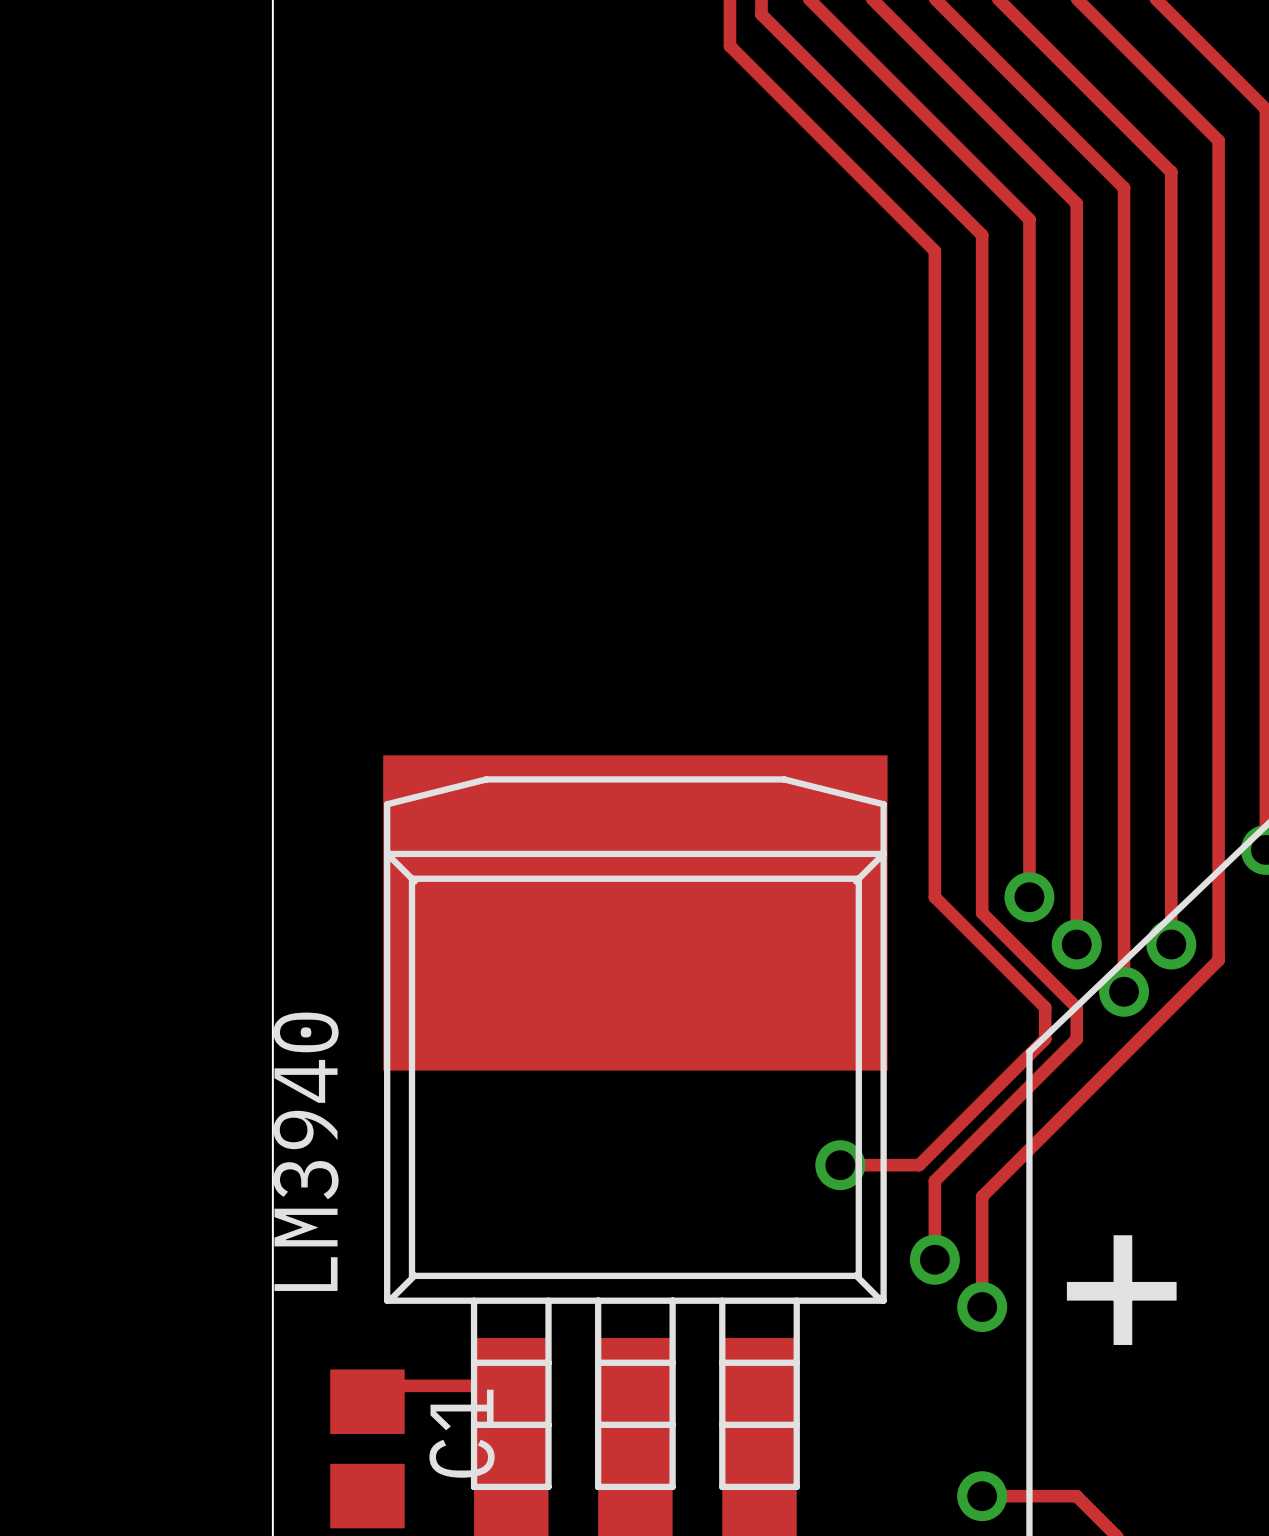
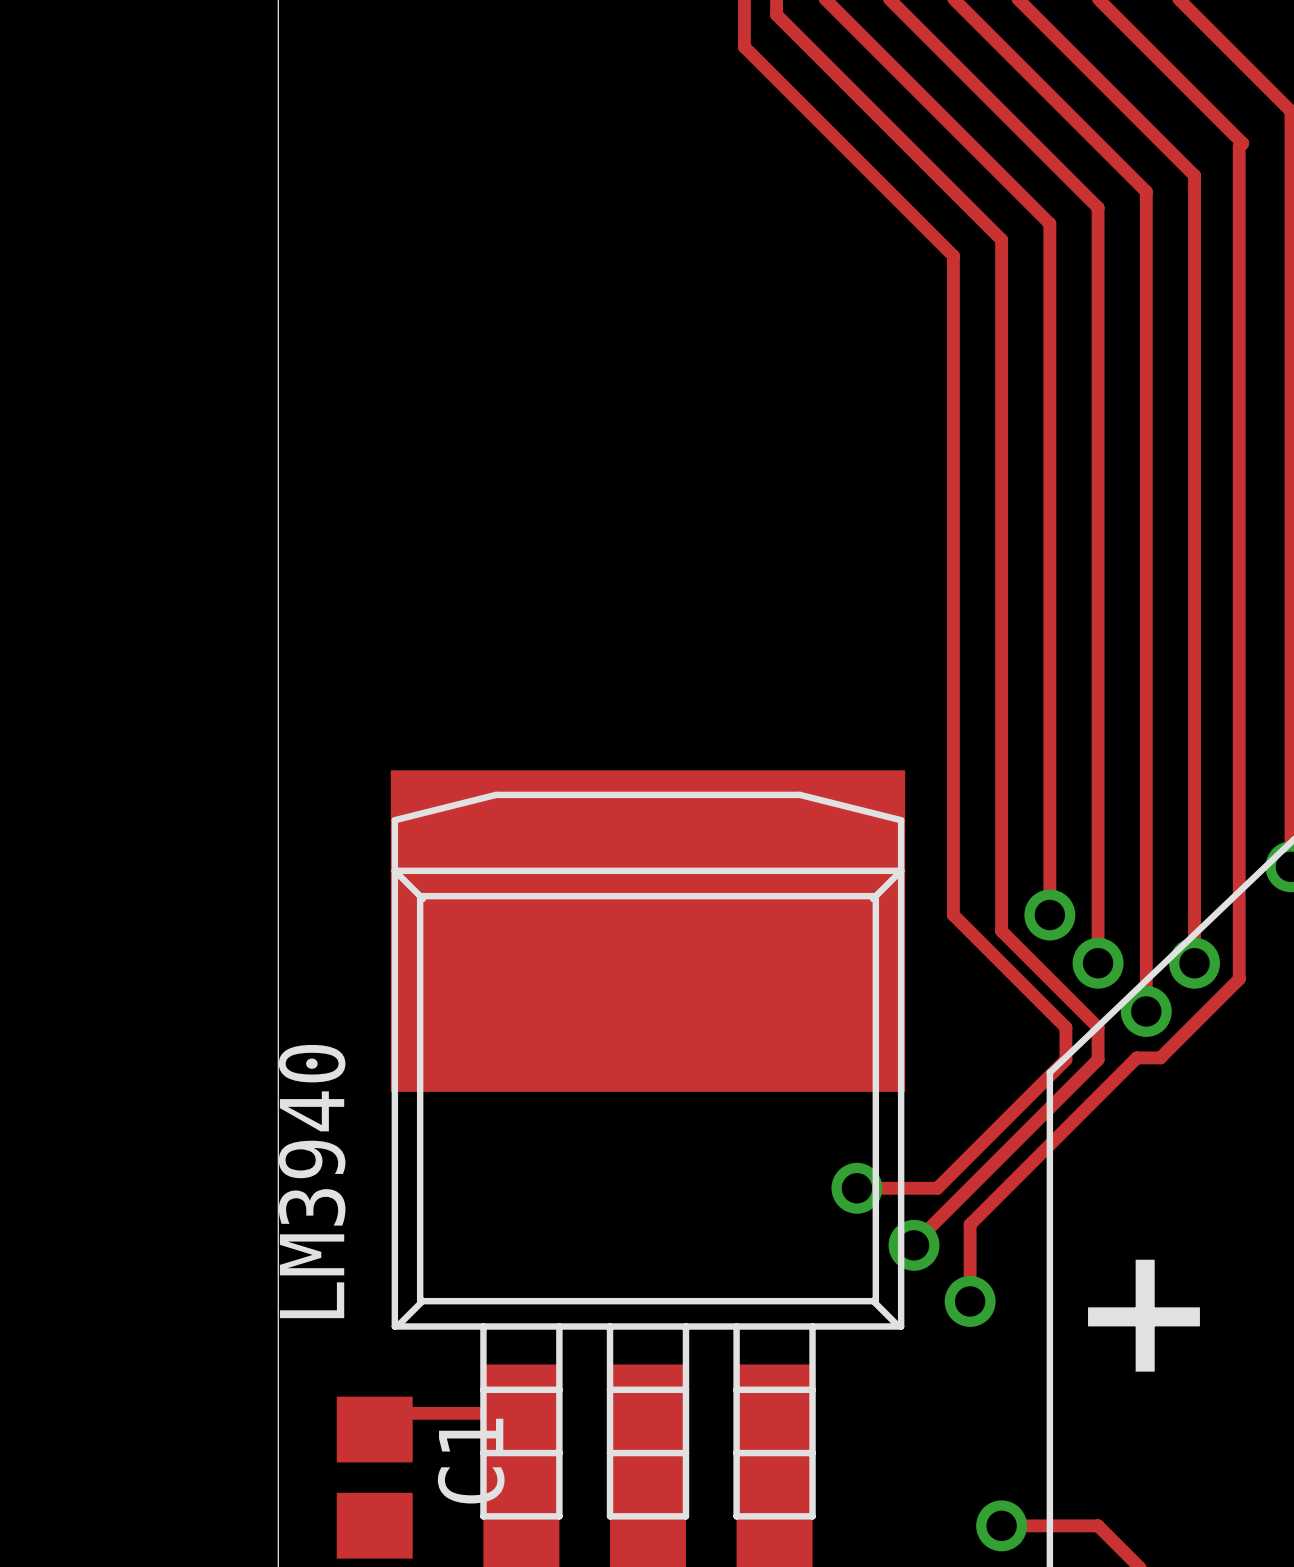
track: (1218, 140) (1218, 960) (982, 1196) (982, 1307) -> (1242, 143) (1239, 146) (1239, 979) (1160, 1057) (1136, 1057) (970, 1224) (970, 1301)
track: (934, 1180) (934, 1259) -> (953, 1204) (914, 1245)
via: none -> (914, 1245)
via: (934, 1259) -> none
via: none -> (970, 1301)
via: (982, 1307) -> none

